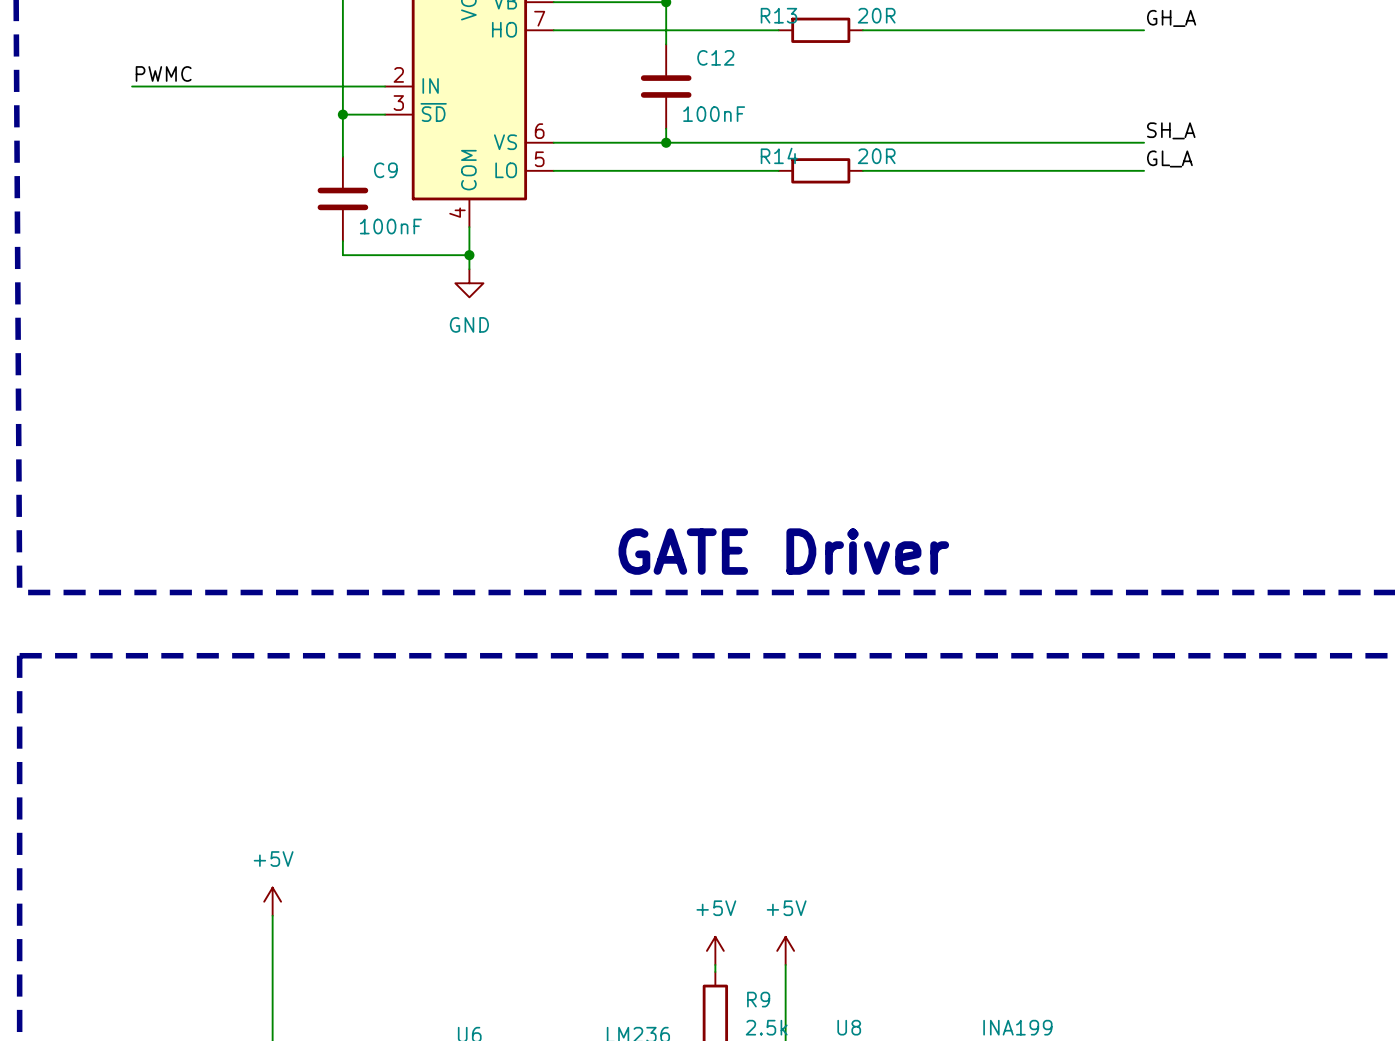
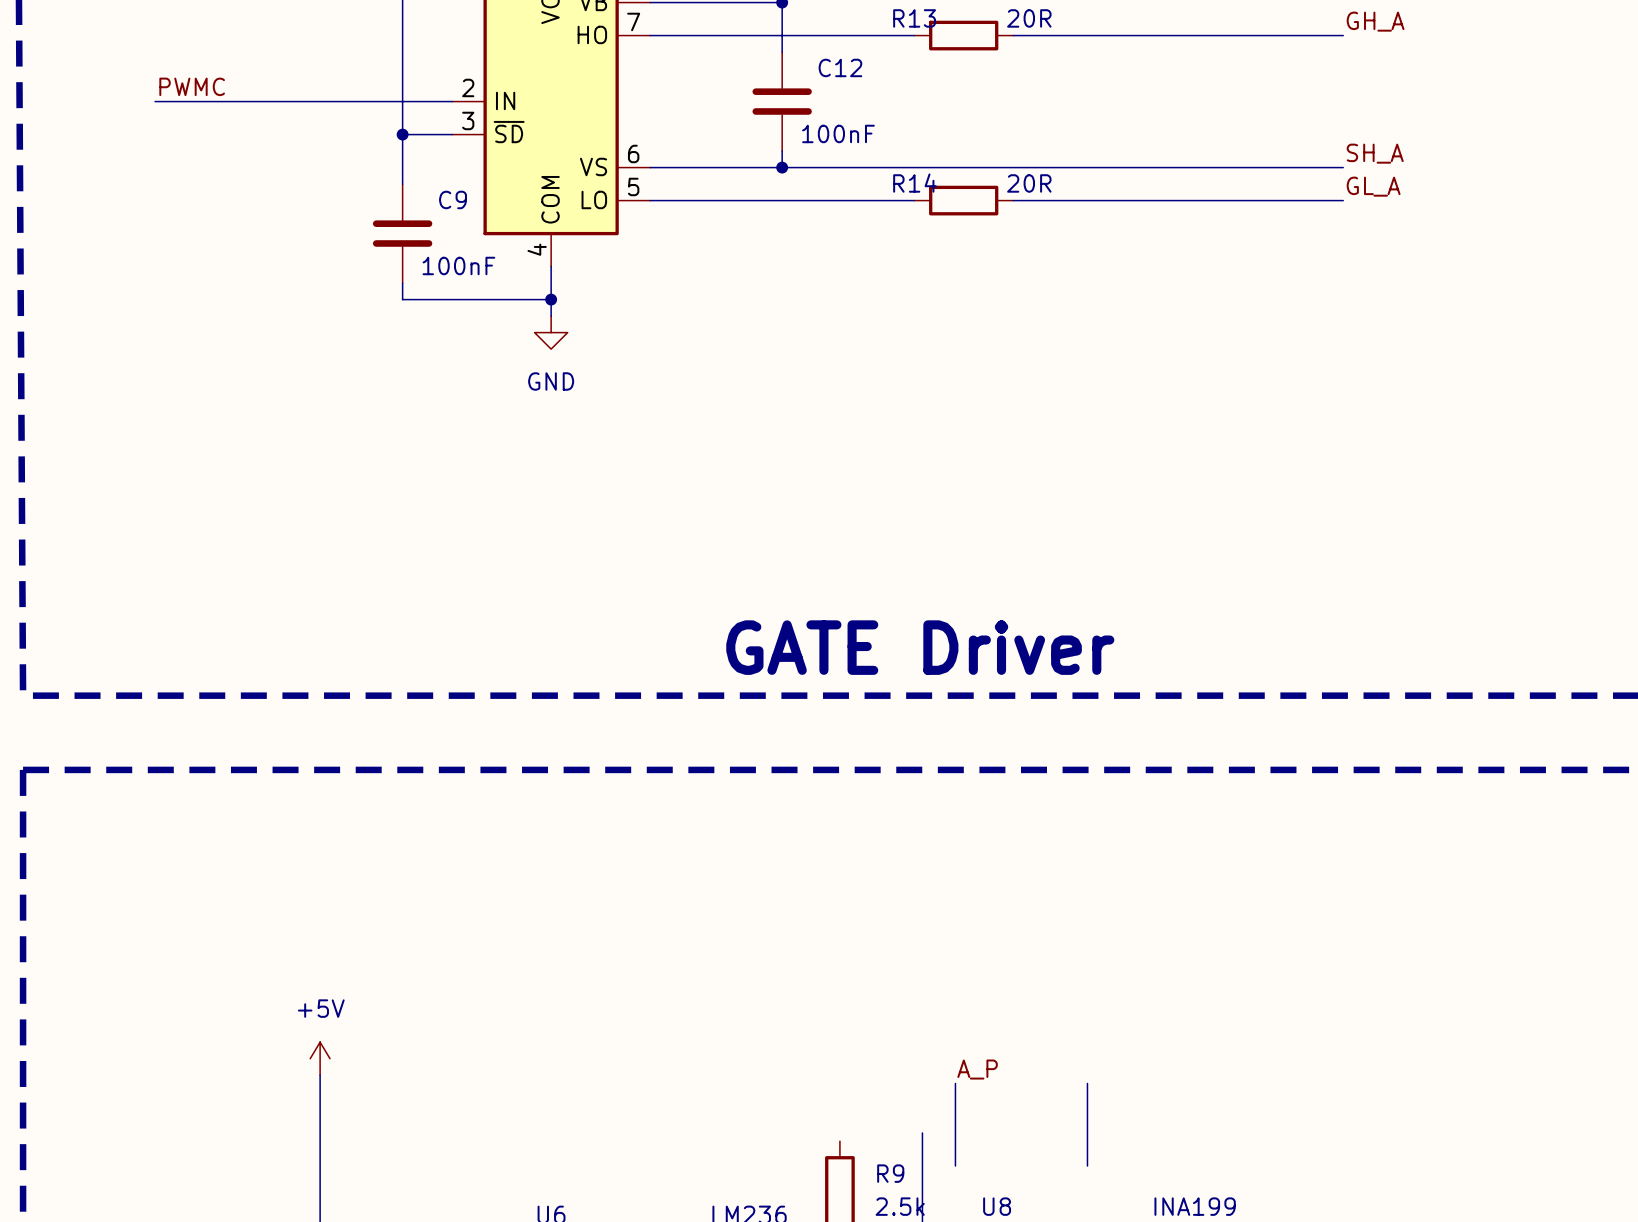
label: none -> A_P (977, 1069)
wire: none -> (955, 1083) (955, 1165)
wire: none -> (1087, 1083) (1087, 1165)
power symbol: +5V (715, 950) -> none
power symbol: +5V (785, 950) -> none
wire: (715, 964) (715, 971) -> none

